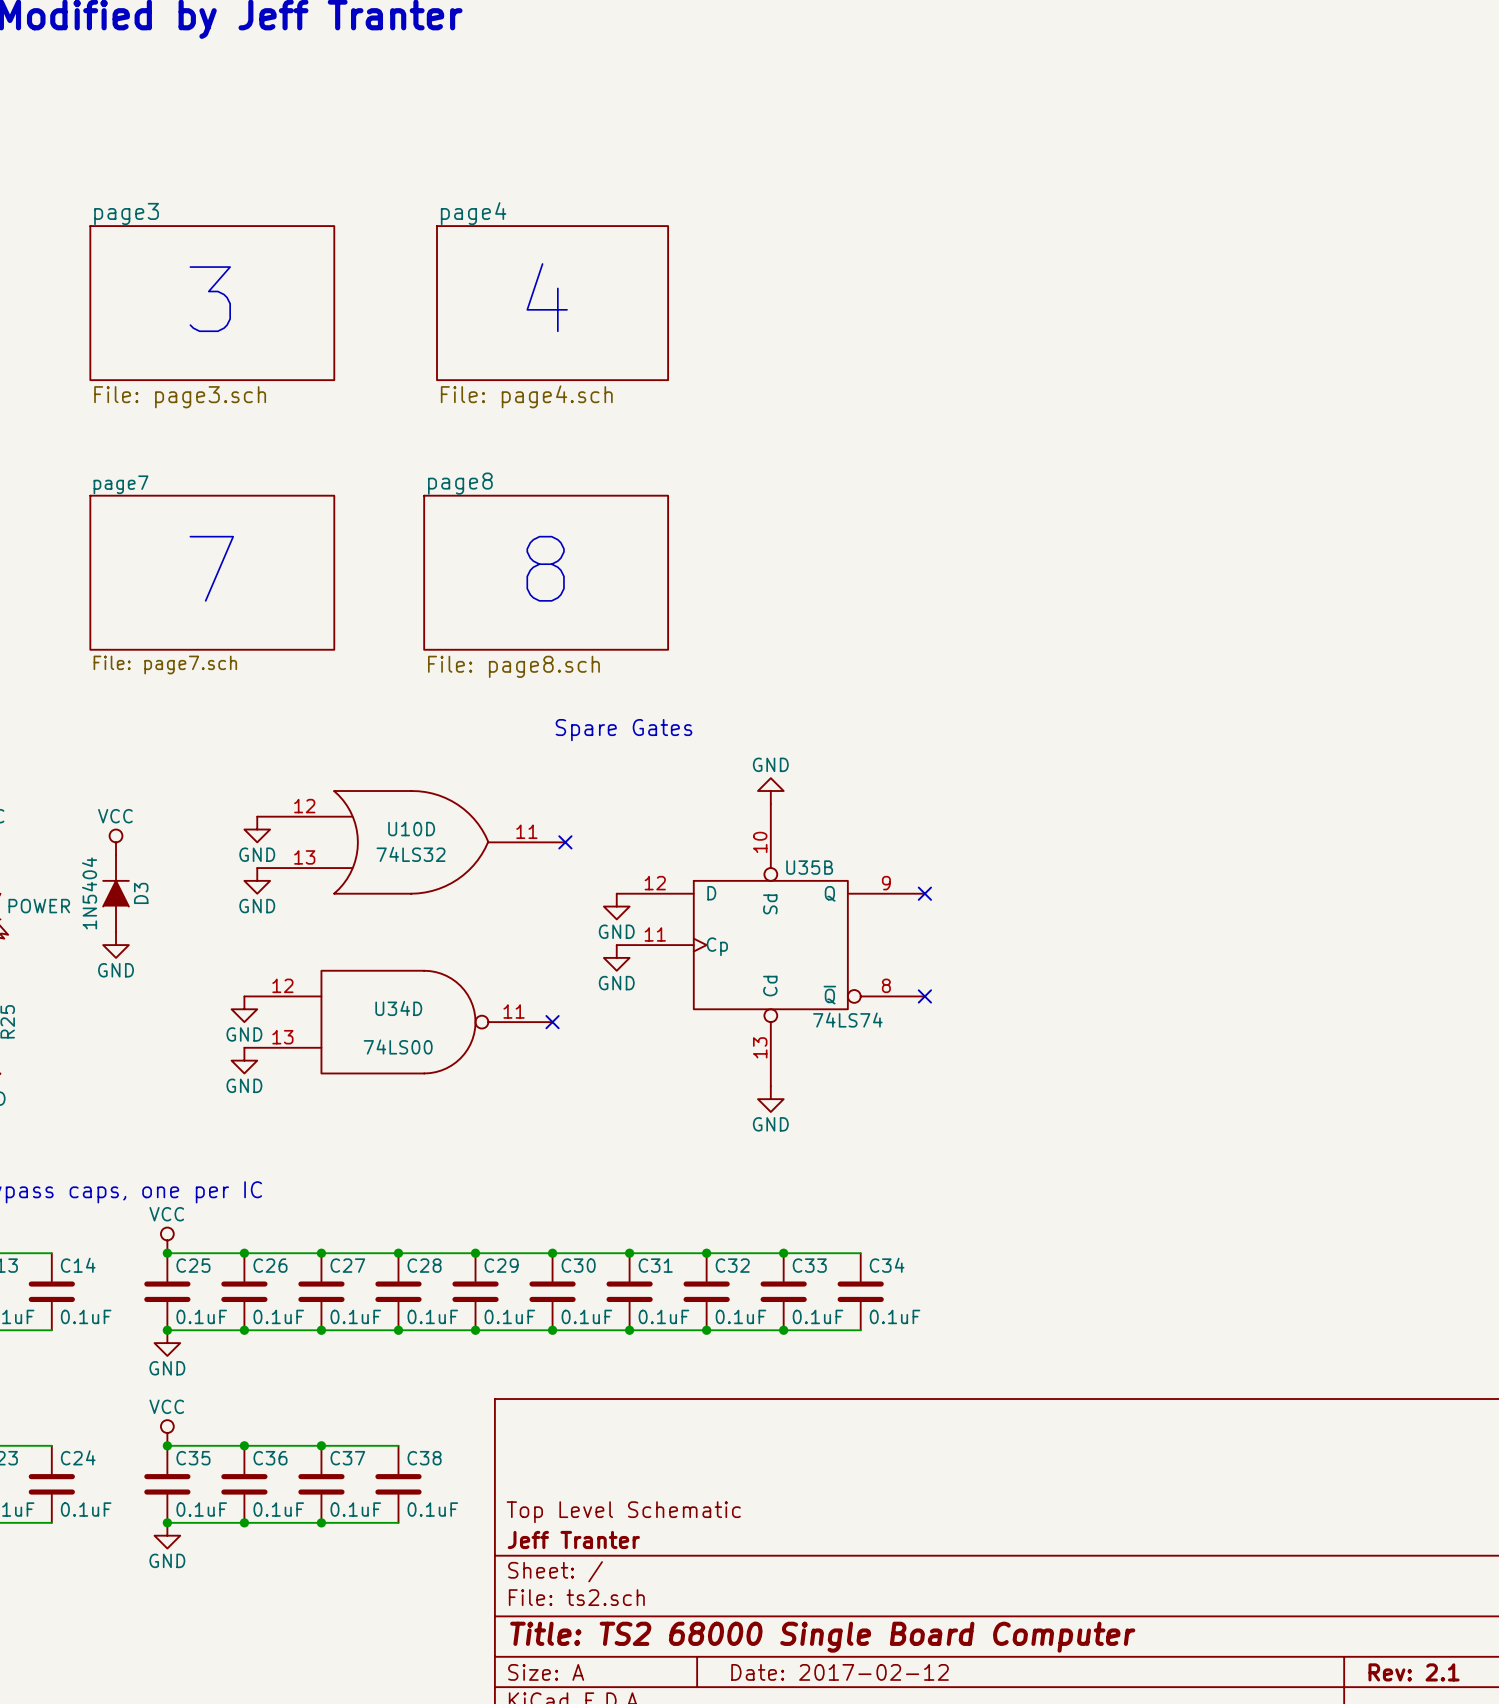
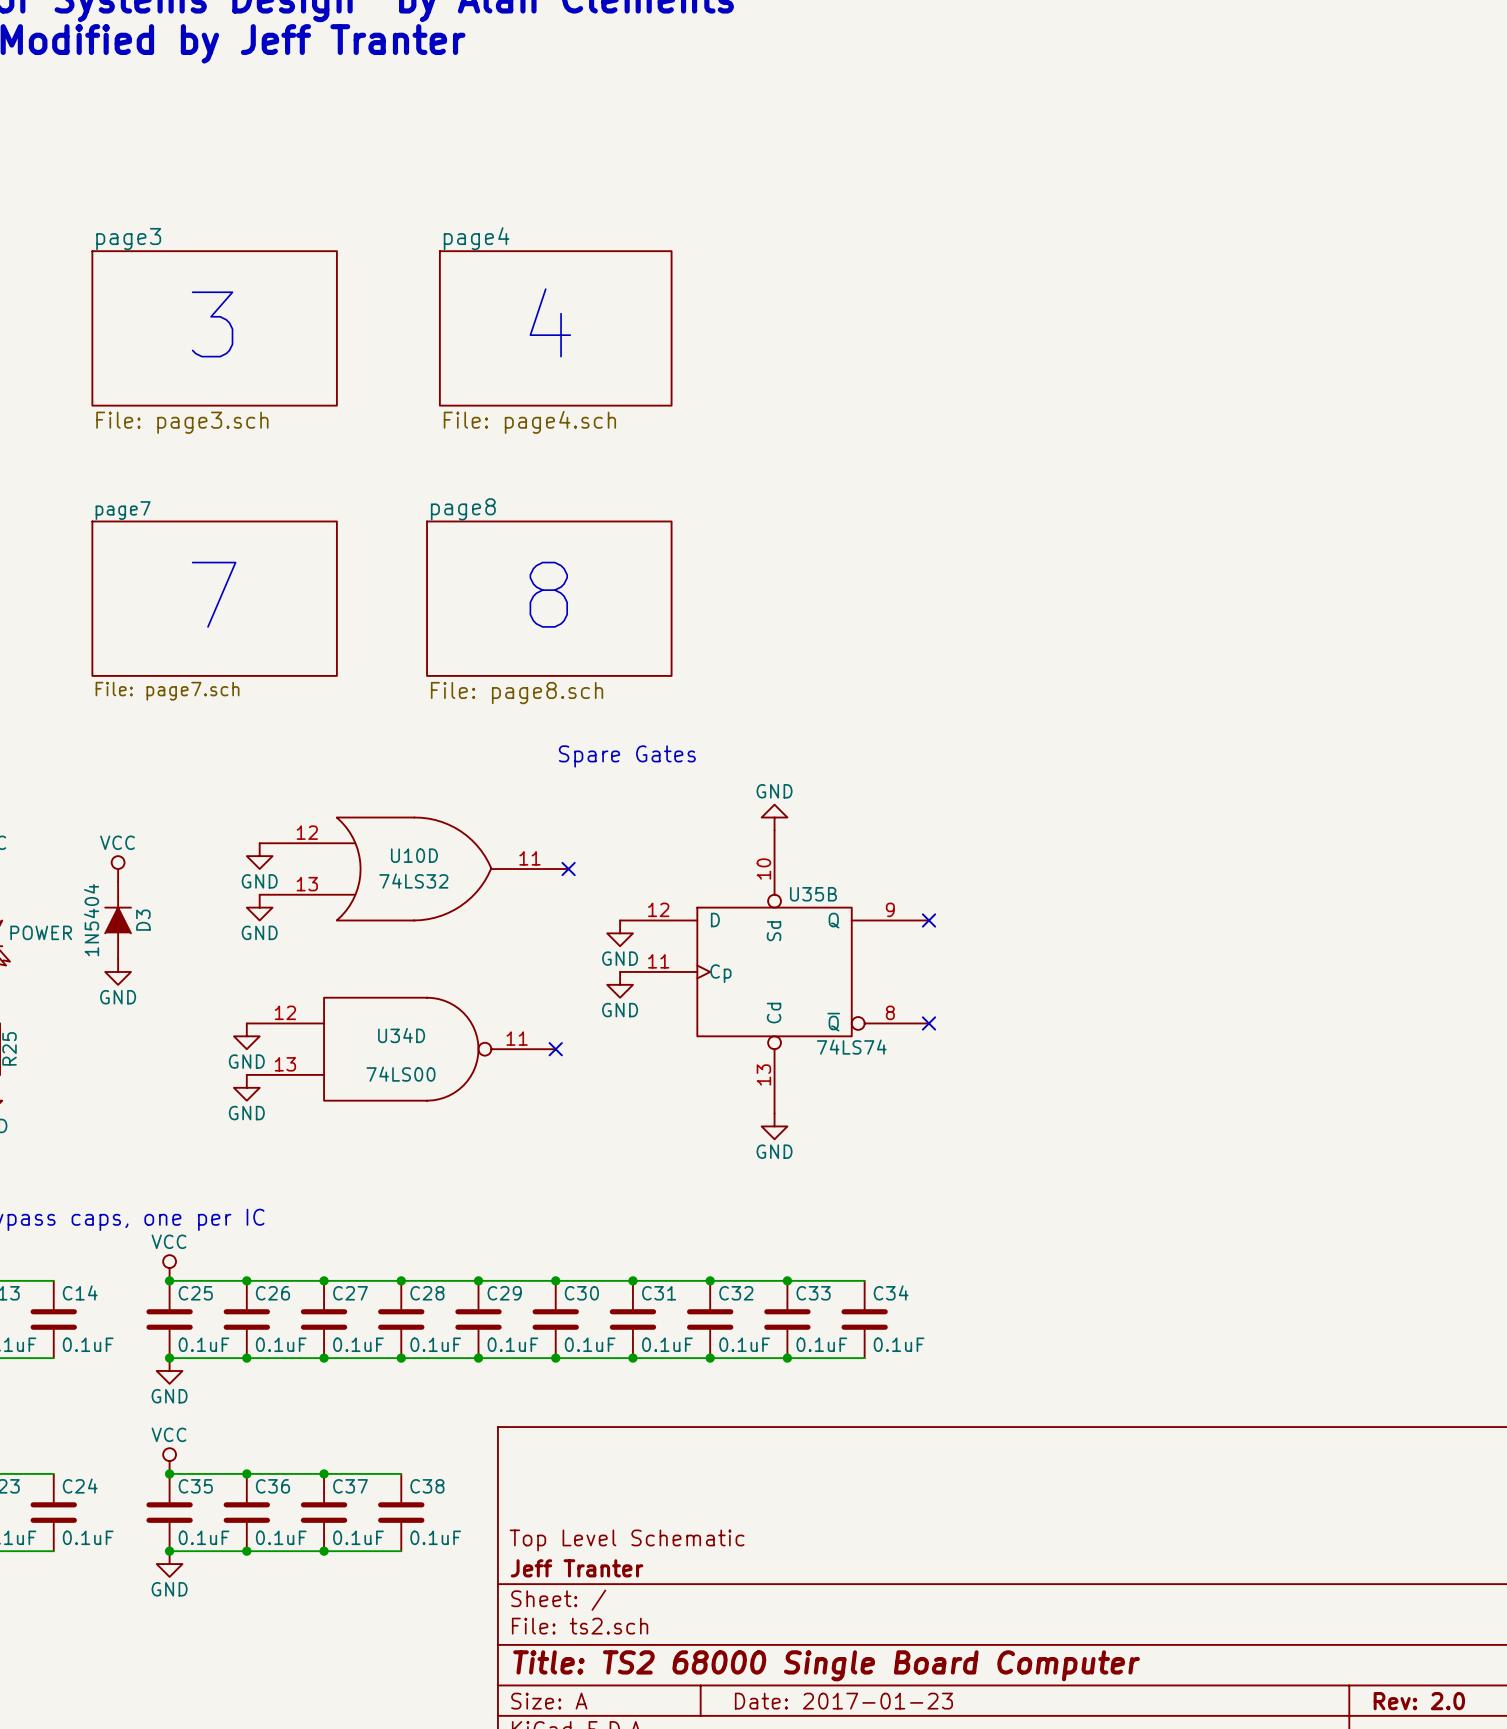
title block: Date: 2017-02-12 (840, 1672) -> Date: 2017-01-23 (843, 1701)
title block: Rev: 2.1 (1414, 1672) -> Rev: 2.0 (1419, 1701)

